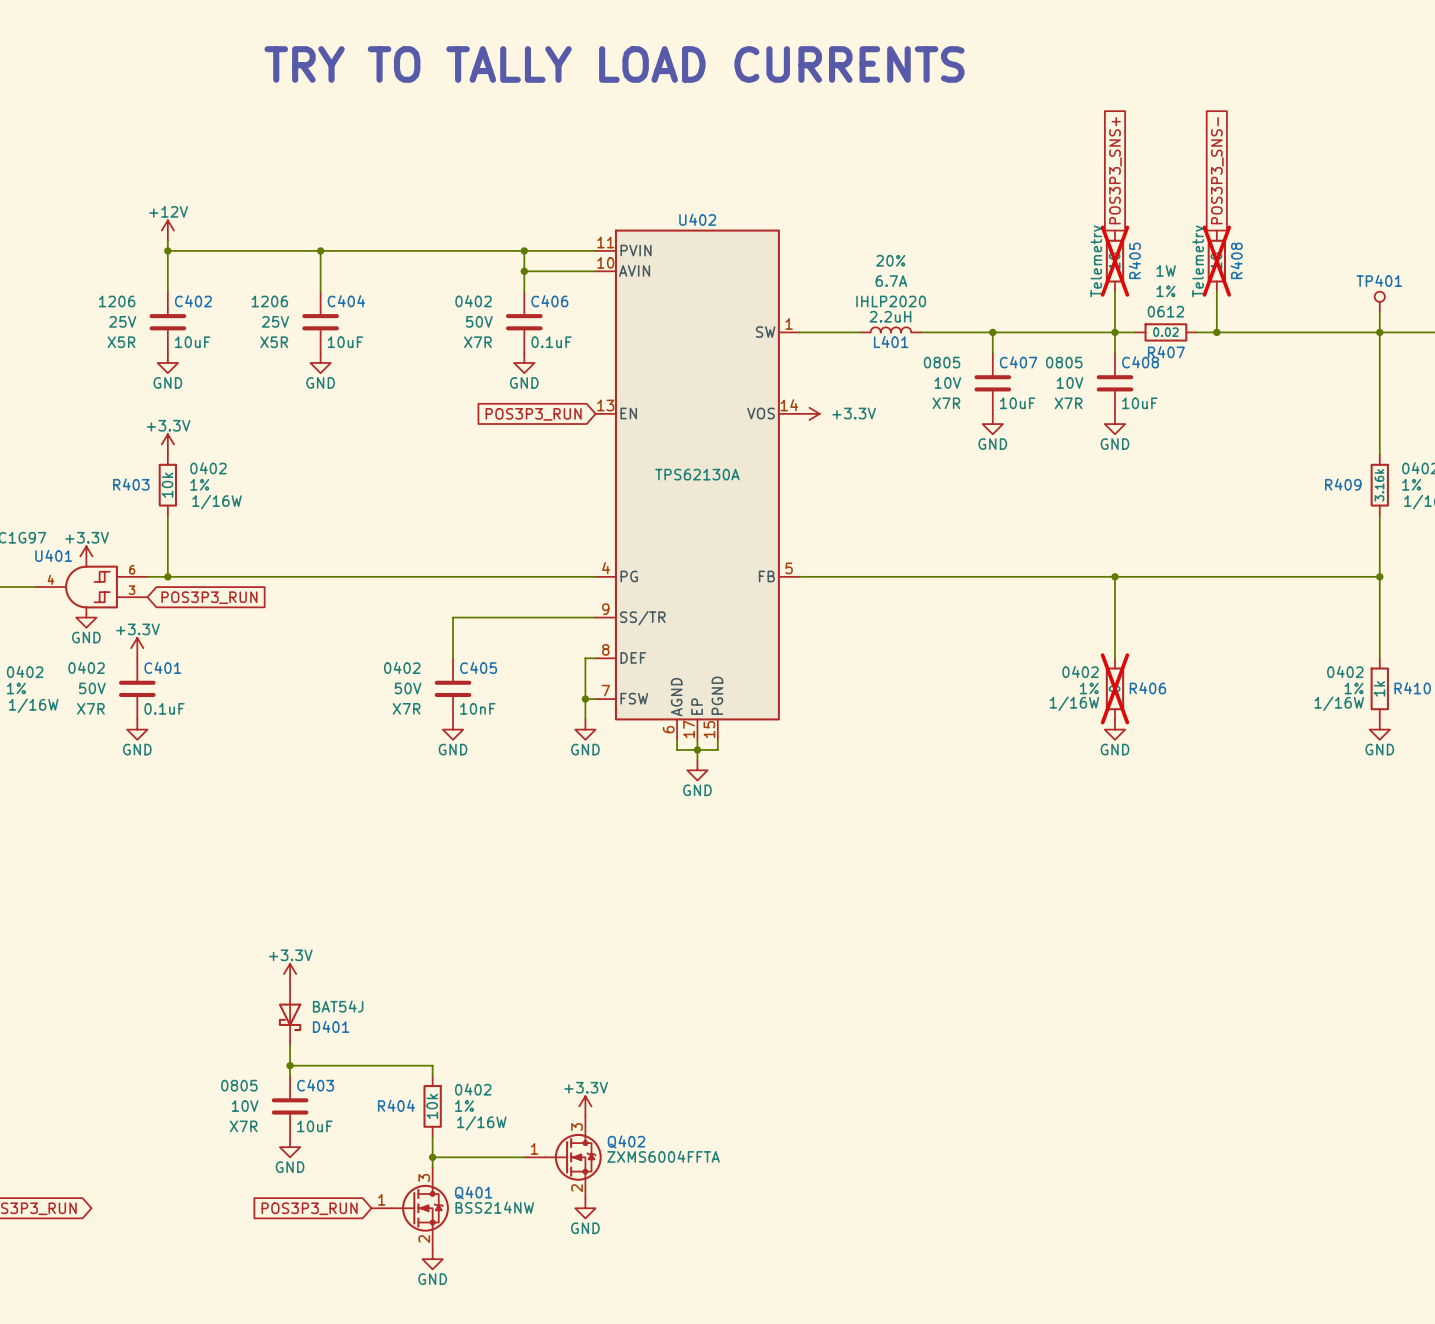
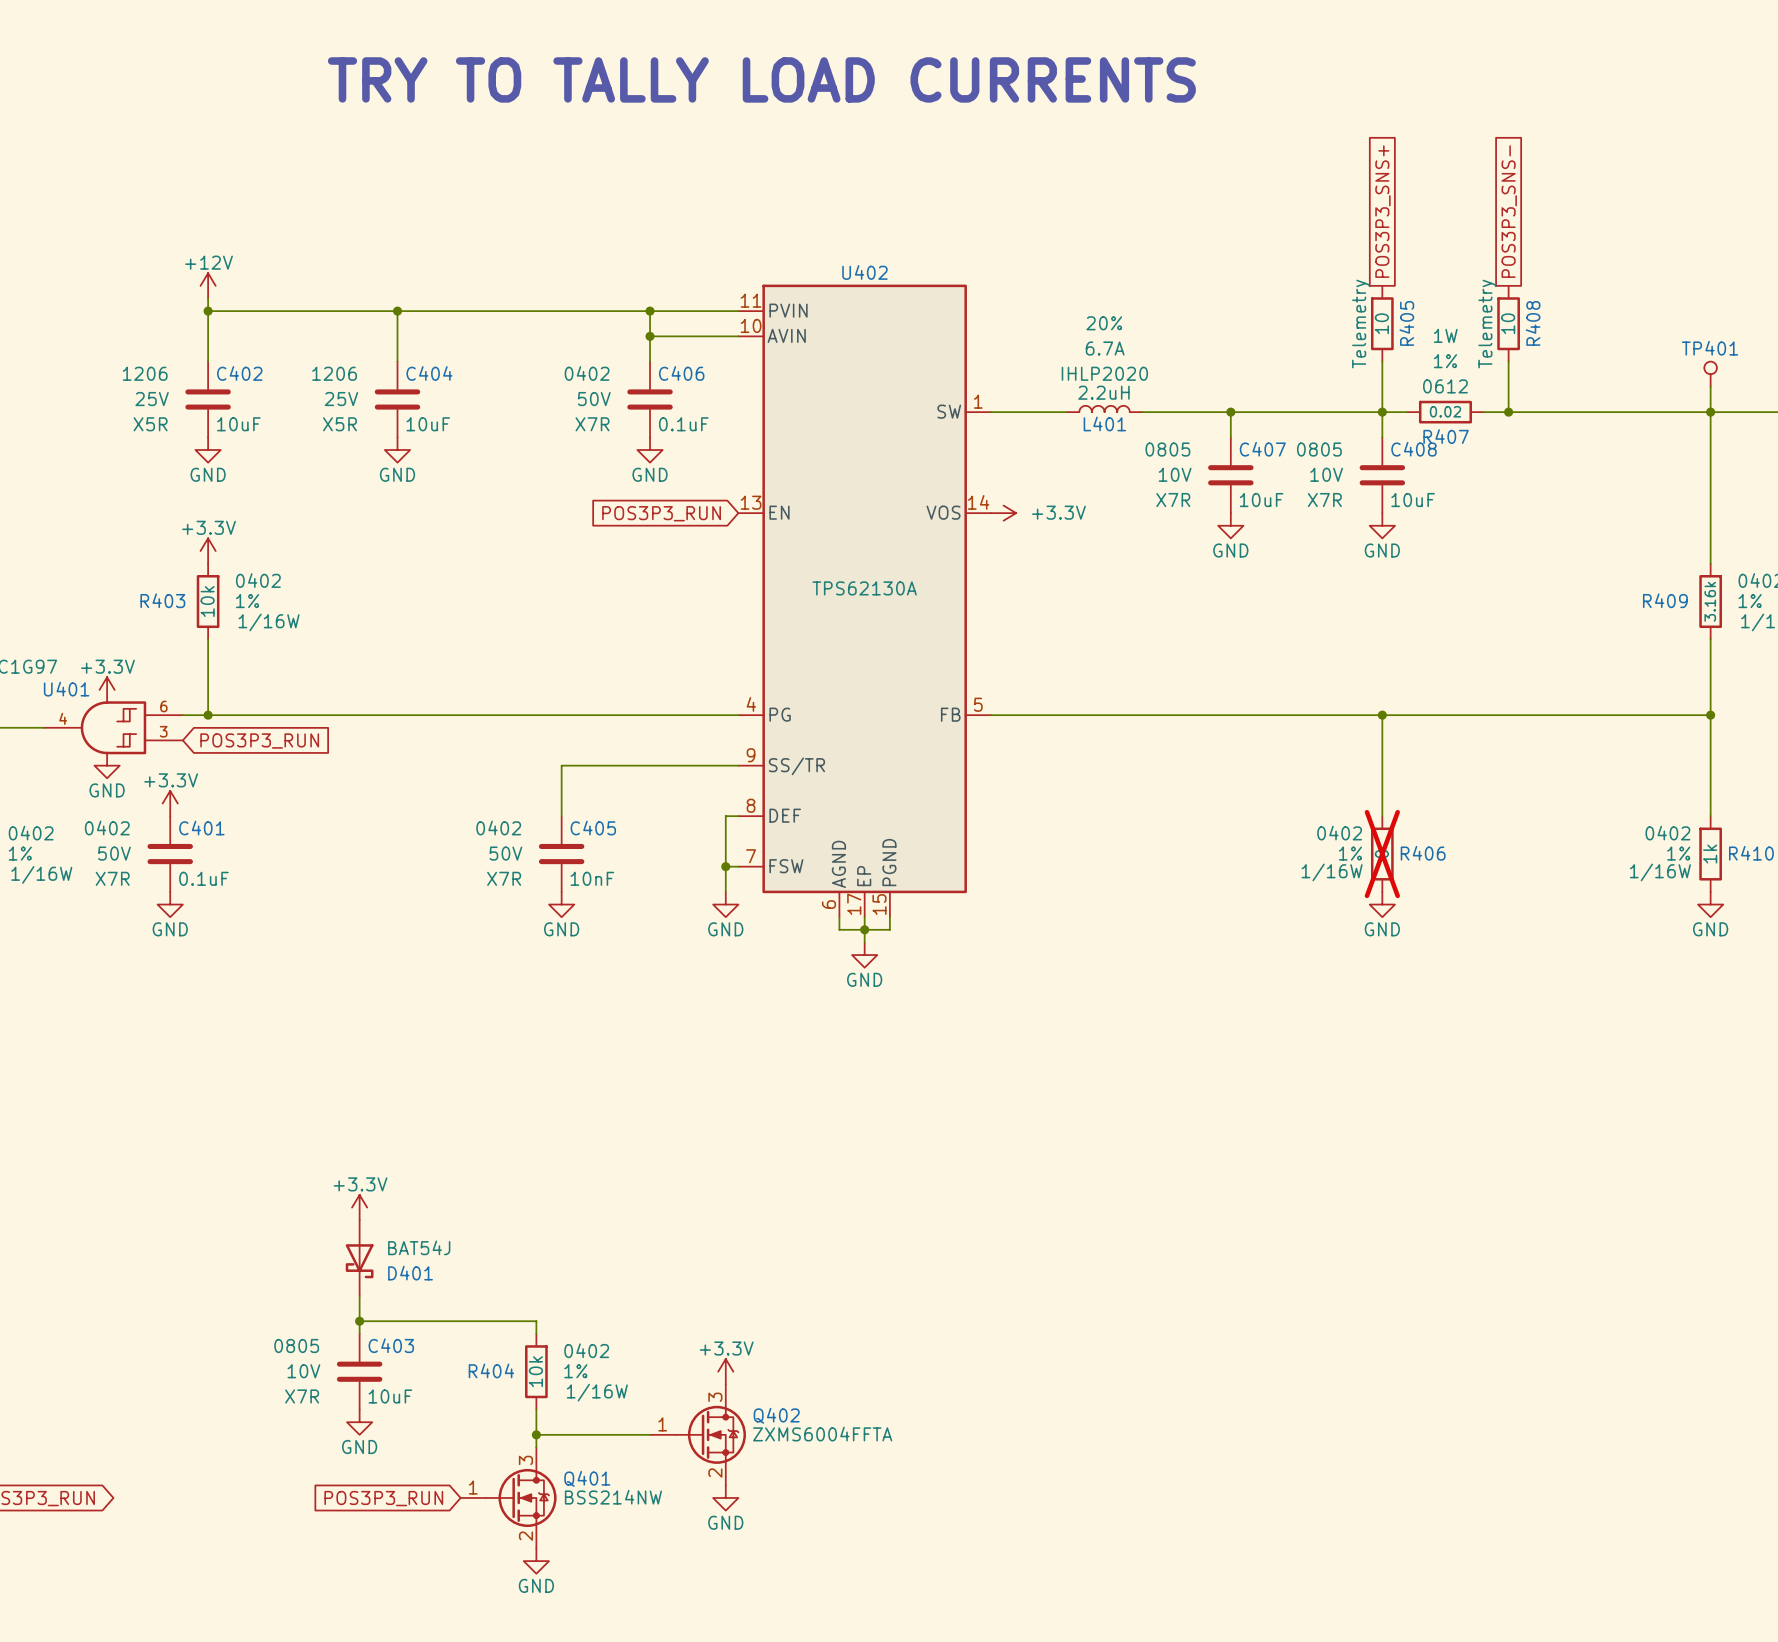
R405 do-not-place cross: (1114, 261) -> none
R408 do-not-place cross: (1216, 261) -> none

